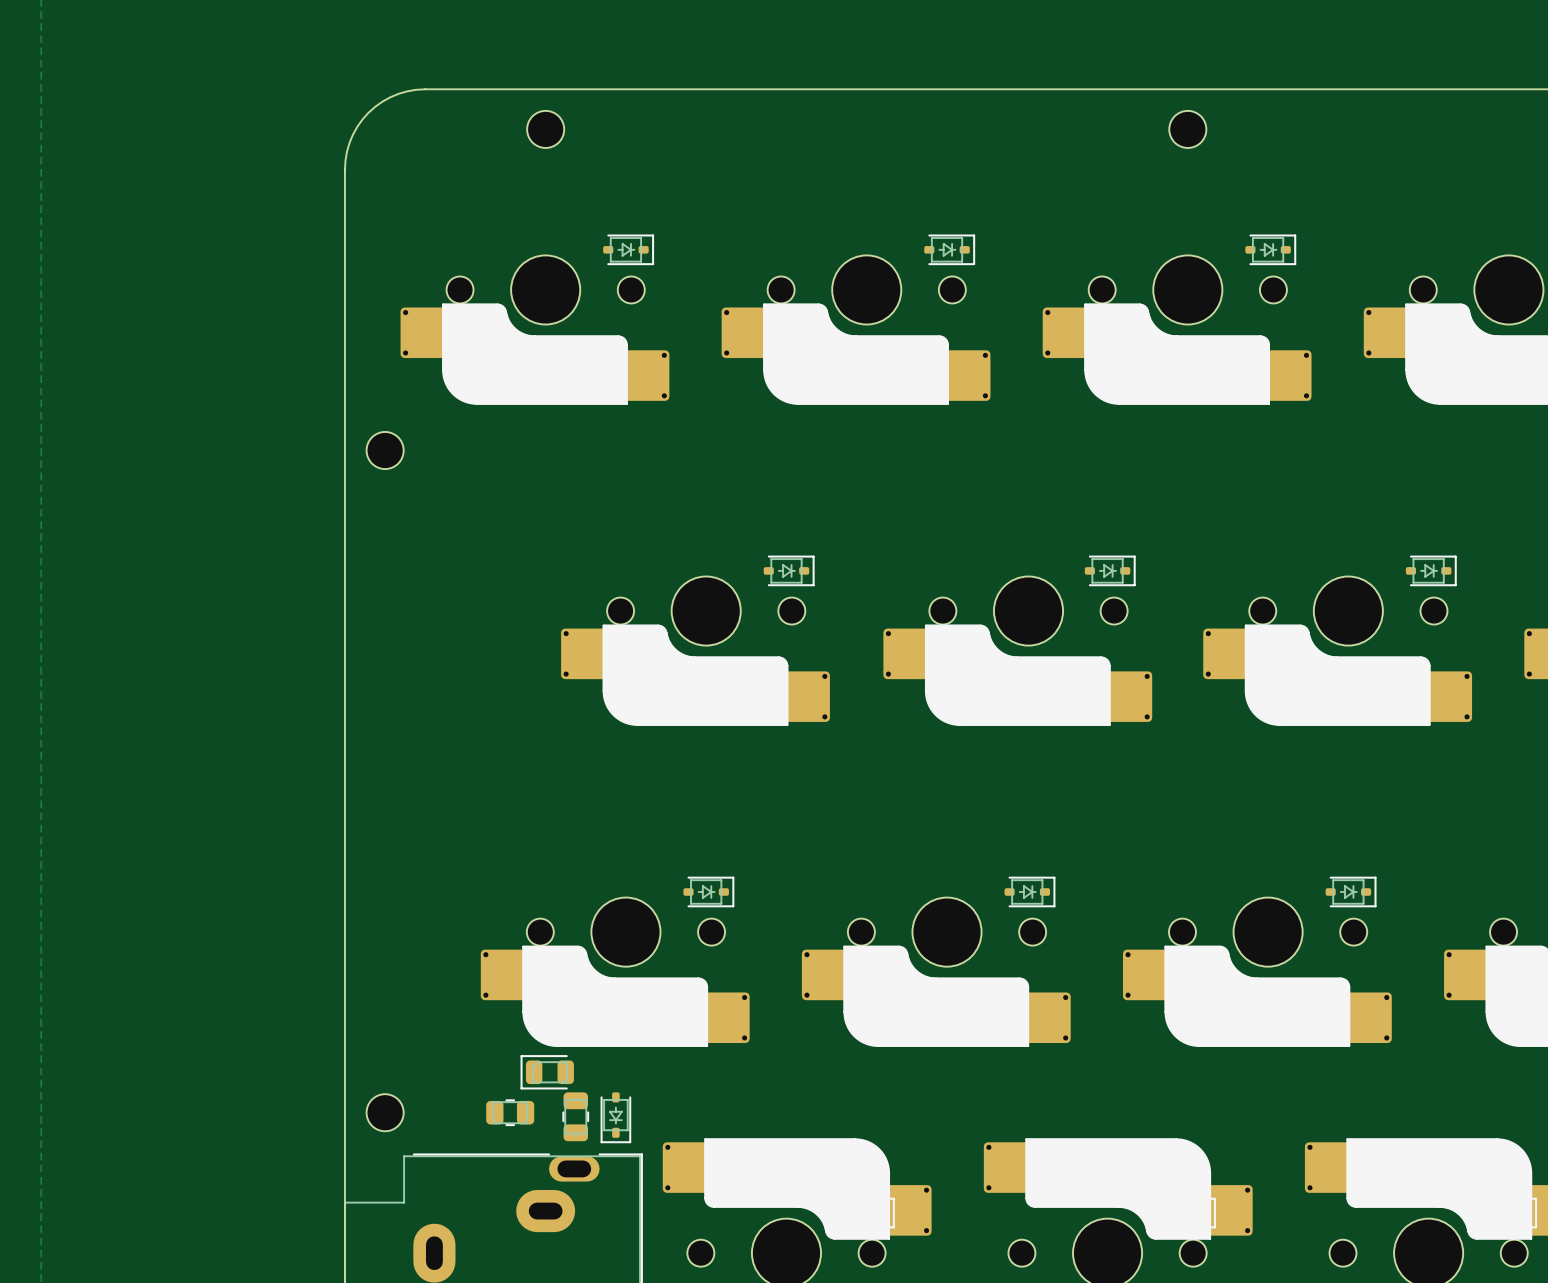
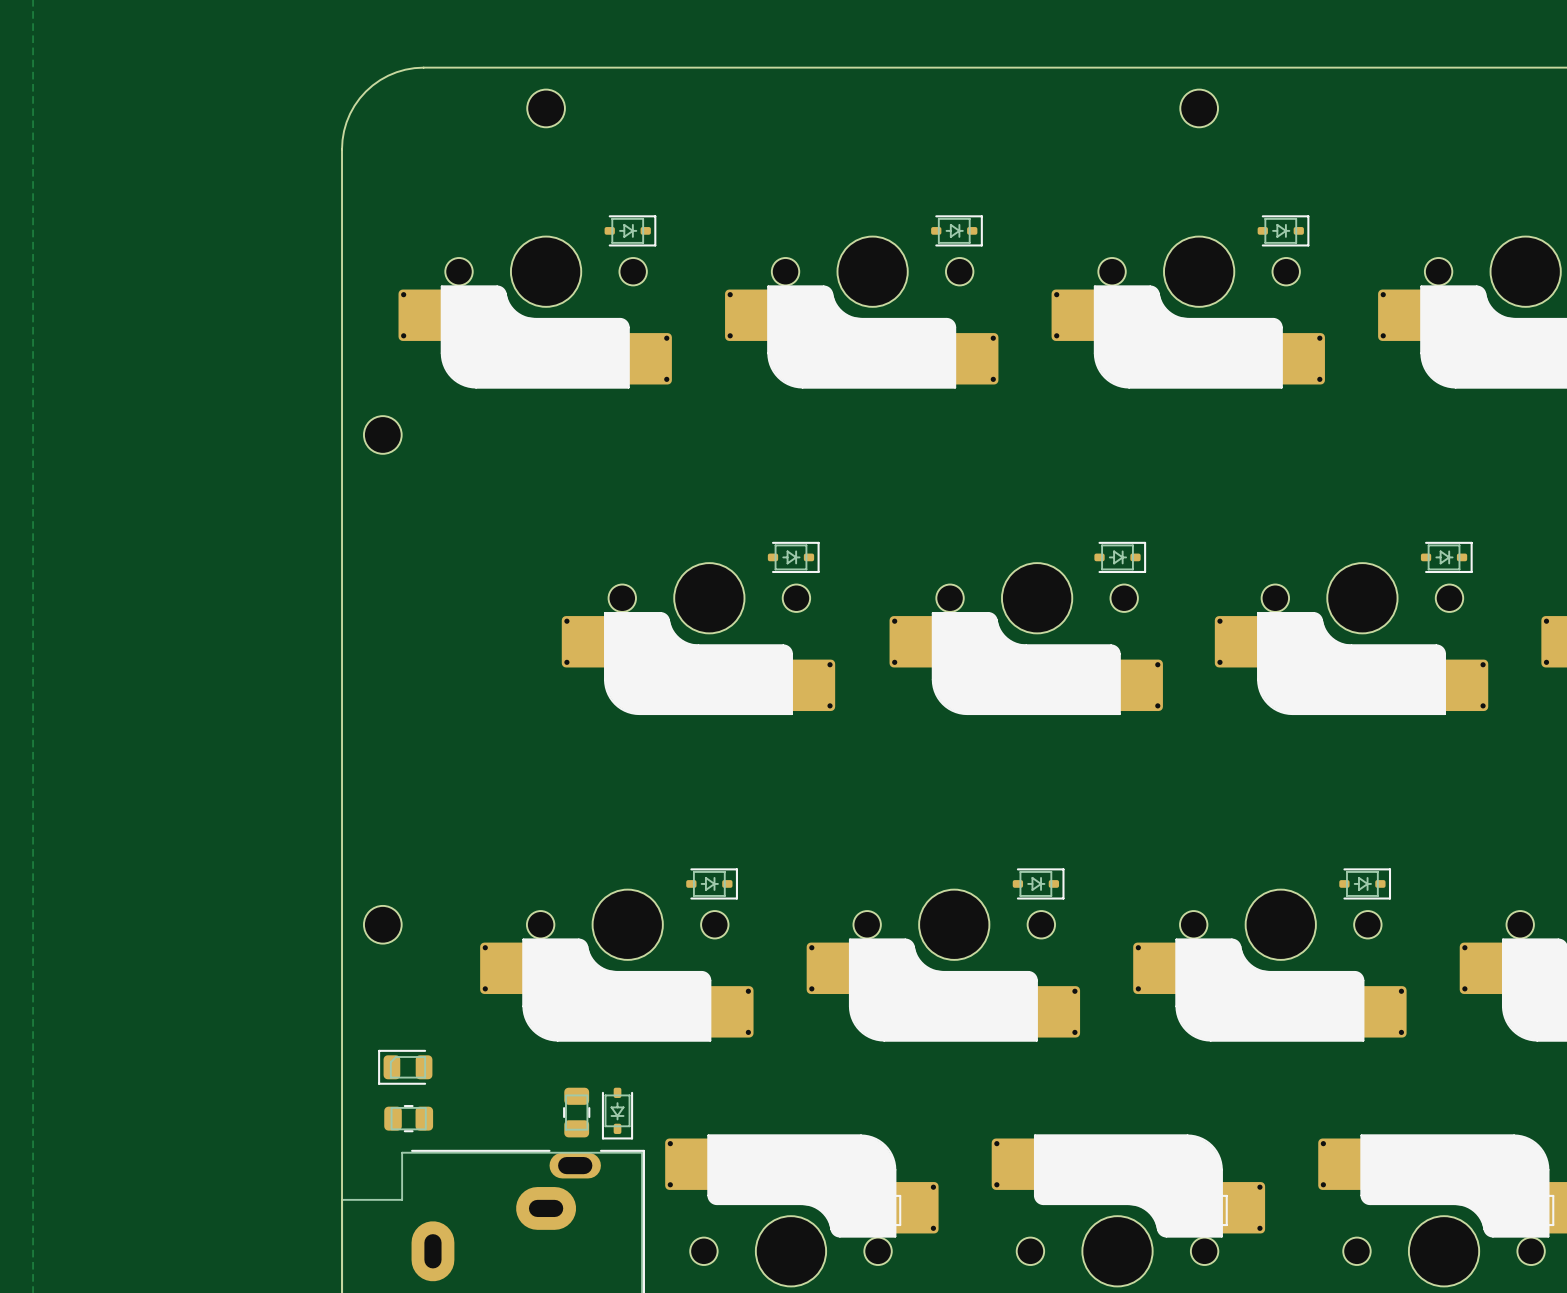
part position: (547, 1072) -> (405, 1067)
part position: (385, 1112) -> (382, 924)
part position: (510, 1112) -> (408, 1118)

